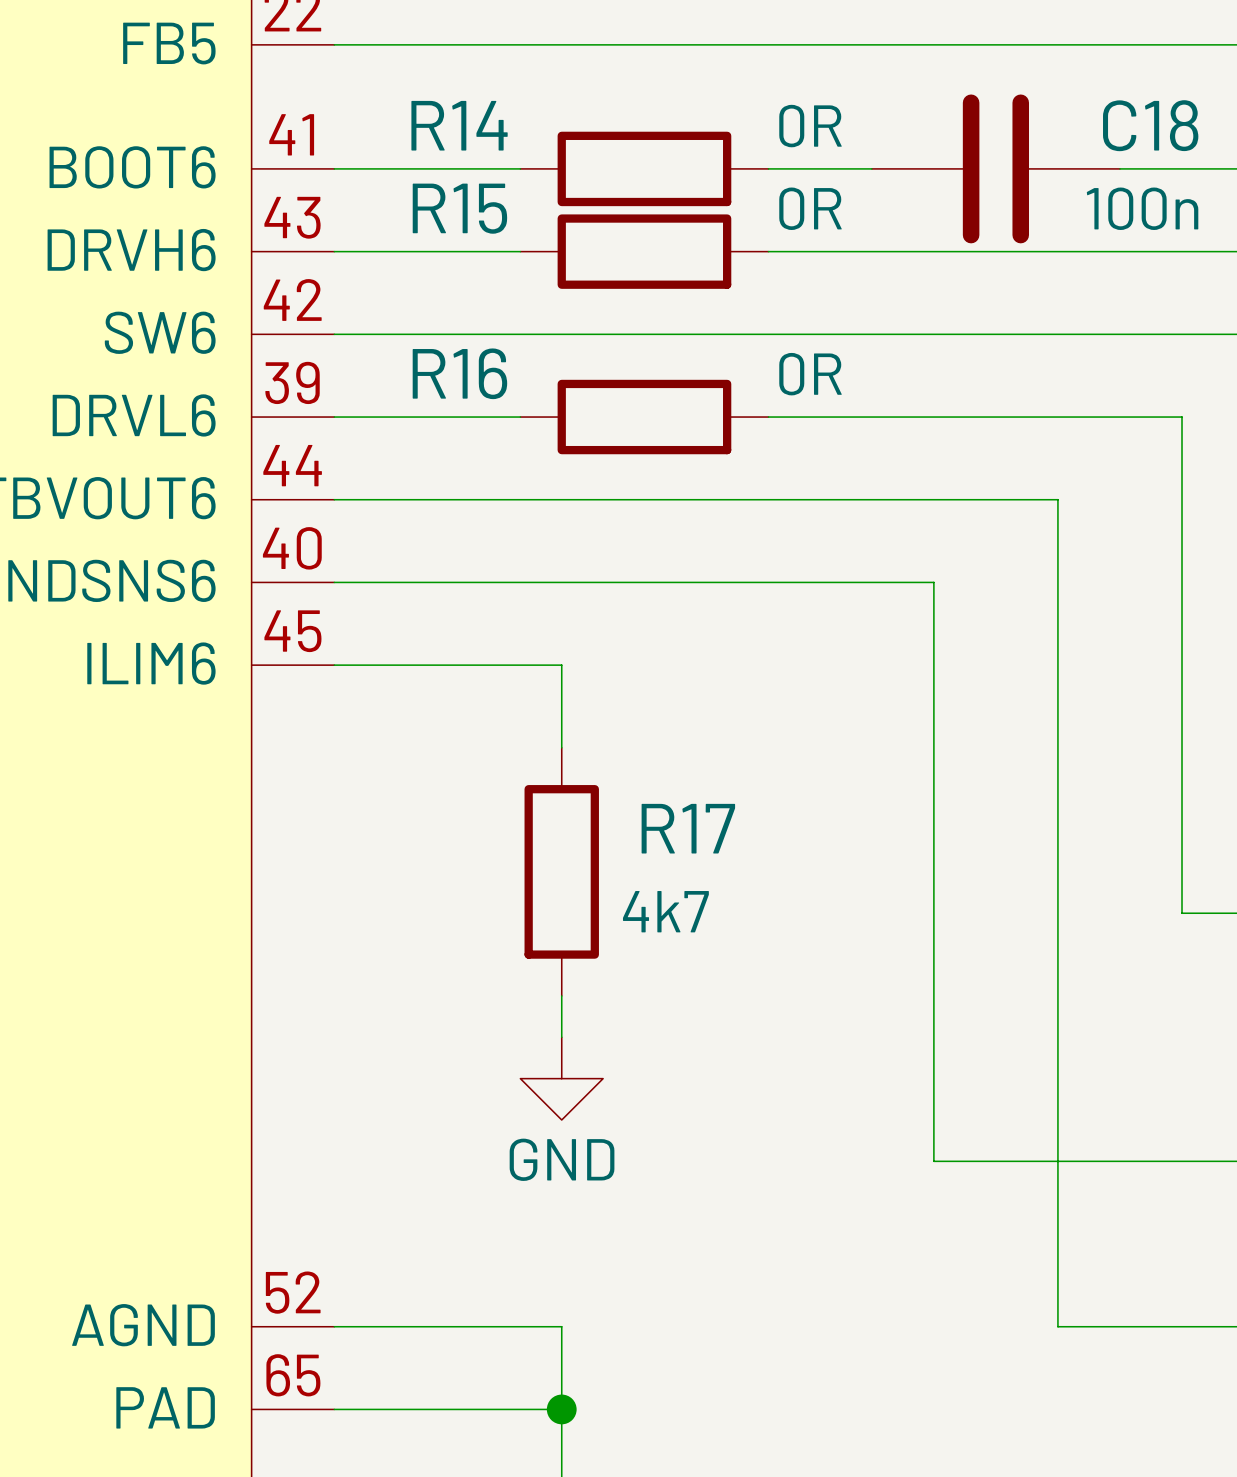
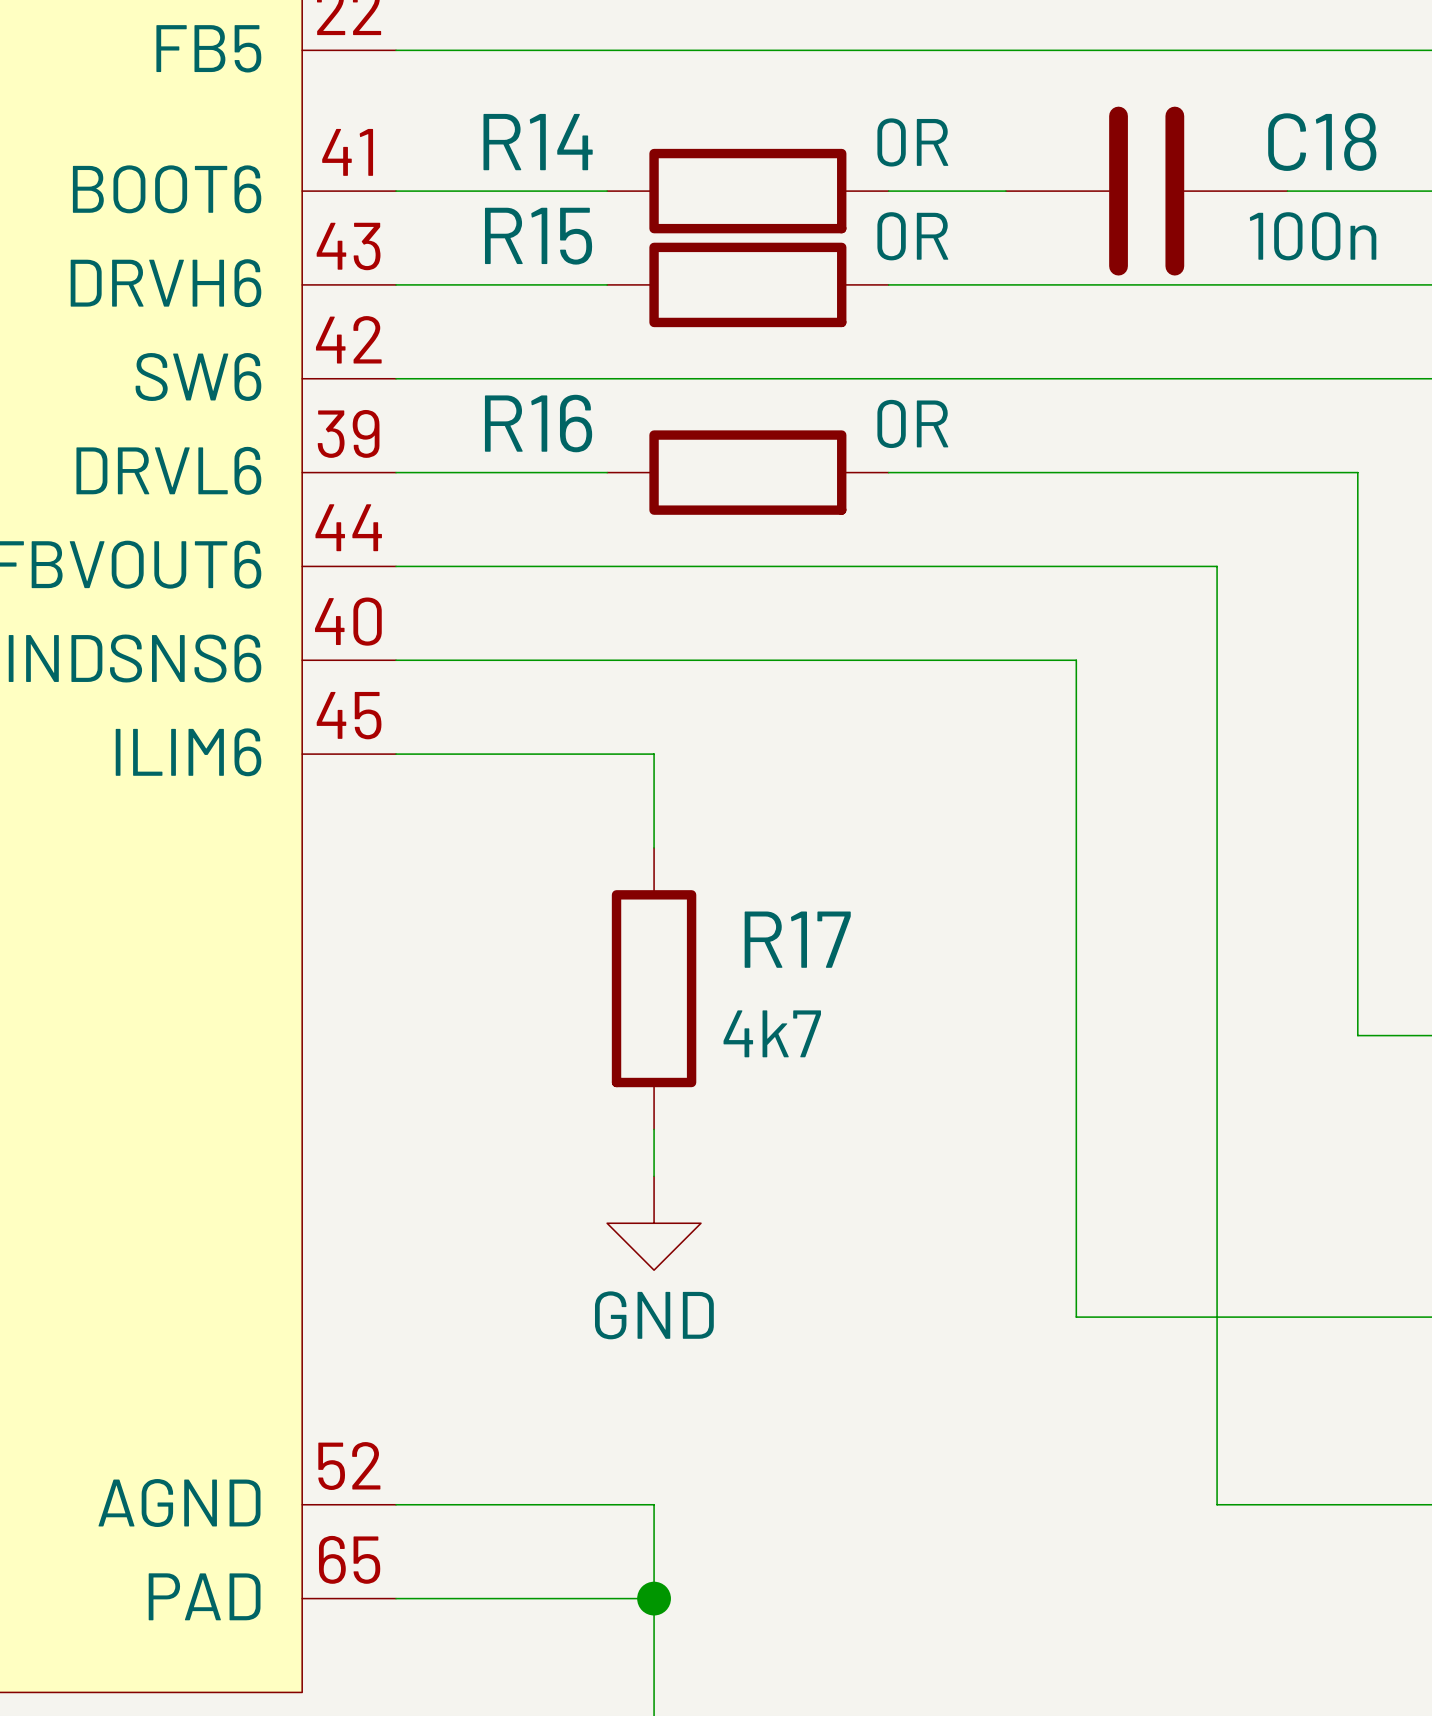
R14 text position: 0R (810, 126) -> 0R (912, 142)
R15 text position: 0R (810, 208) -> 0R (912, 236)
R16 text position: 0R (810, 374) -> 0R (912, 423)

